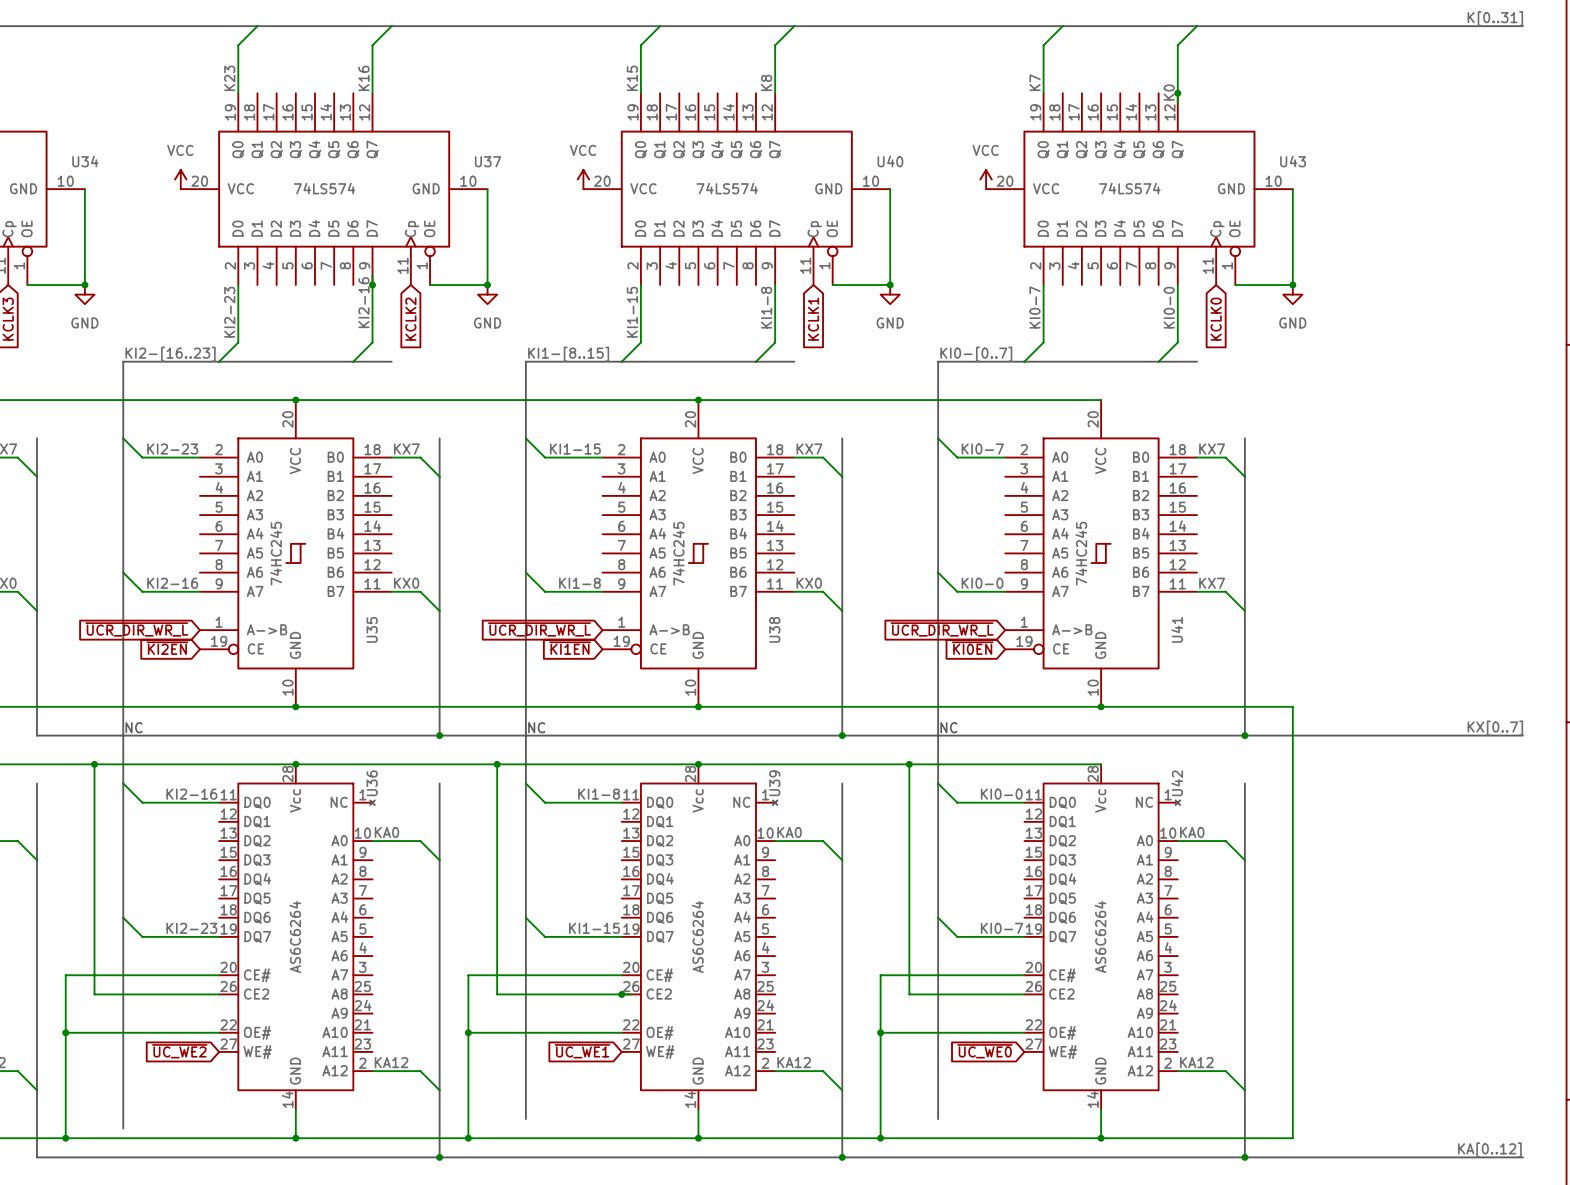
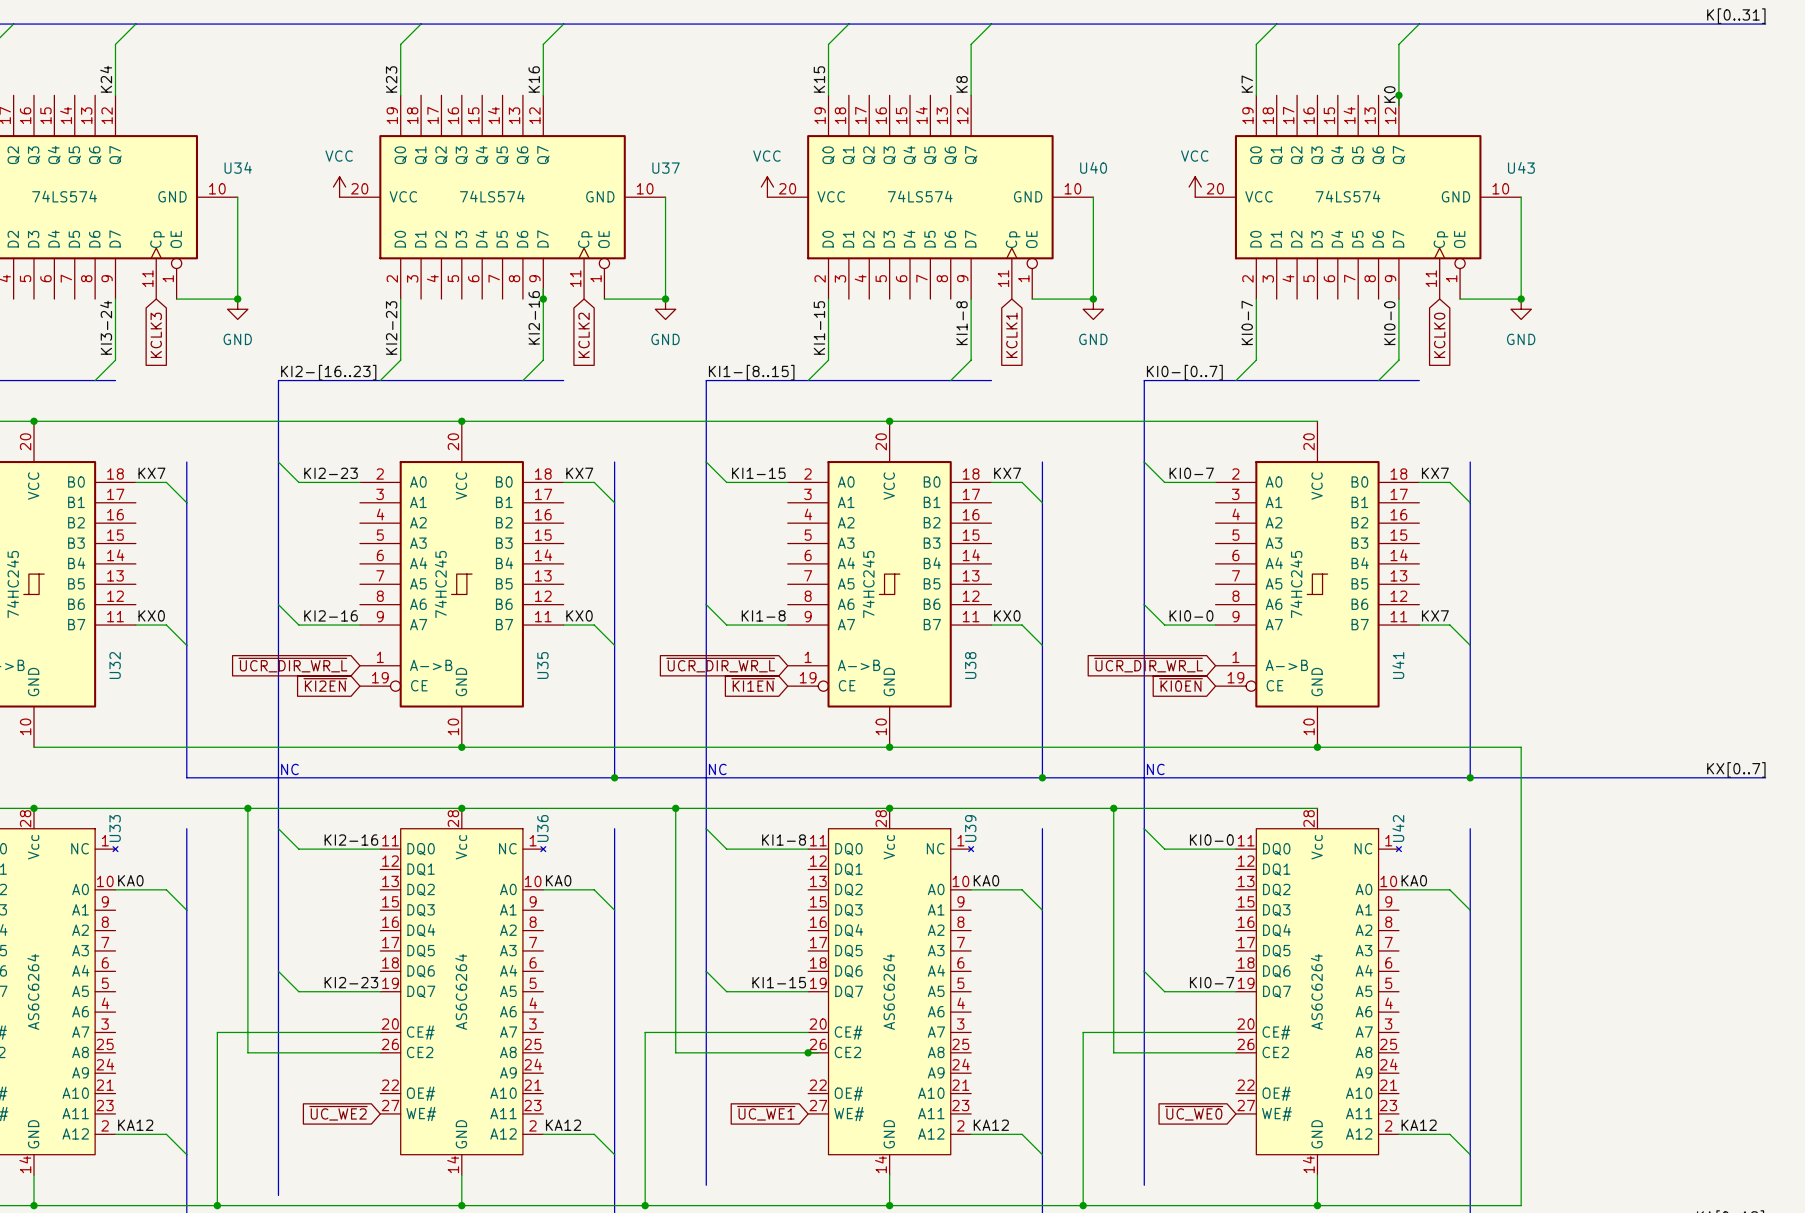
wire: (65, 1032) (219, 1032) -> none
junction: (65, 1032) -> none
wire: (468, 1032) (621, 1032) -> none
junction: (468, 1032) -> none
wire: (880, 1032) (1024, 1032) -> none
junction: (880, 1032) -> none

